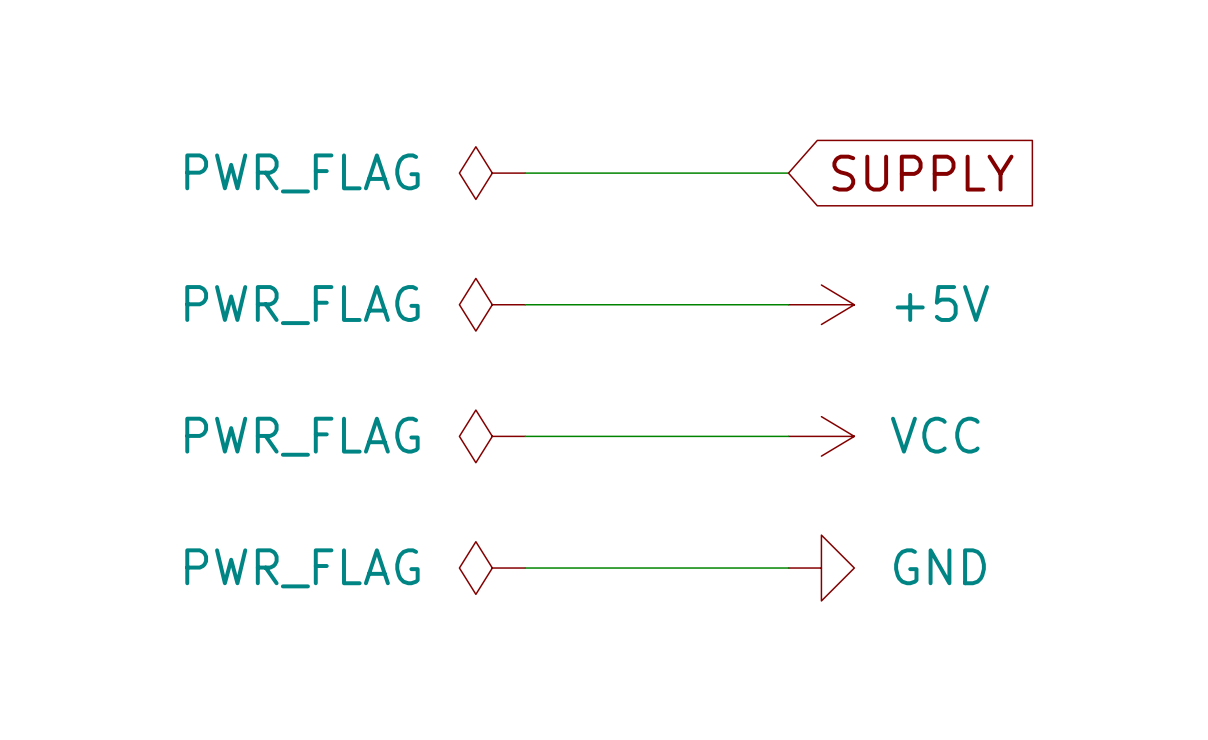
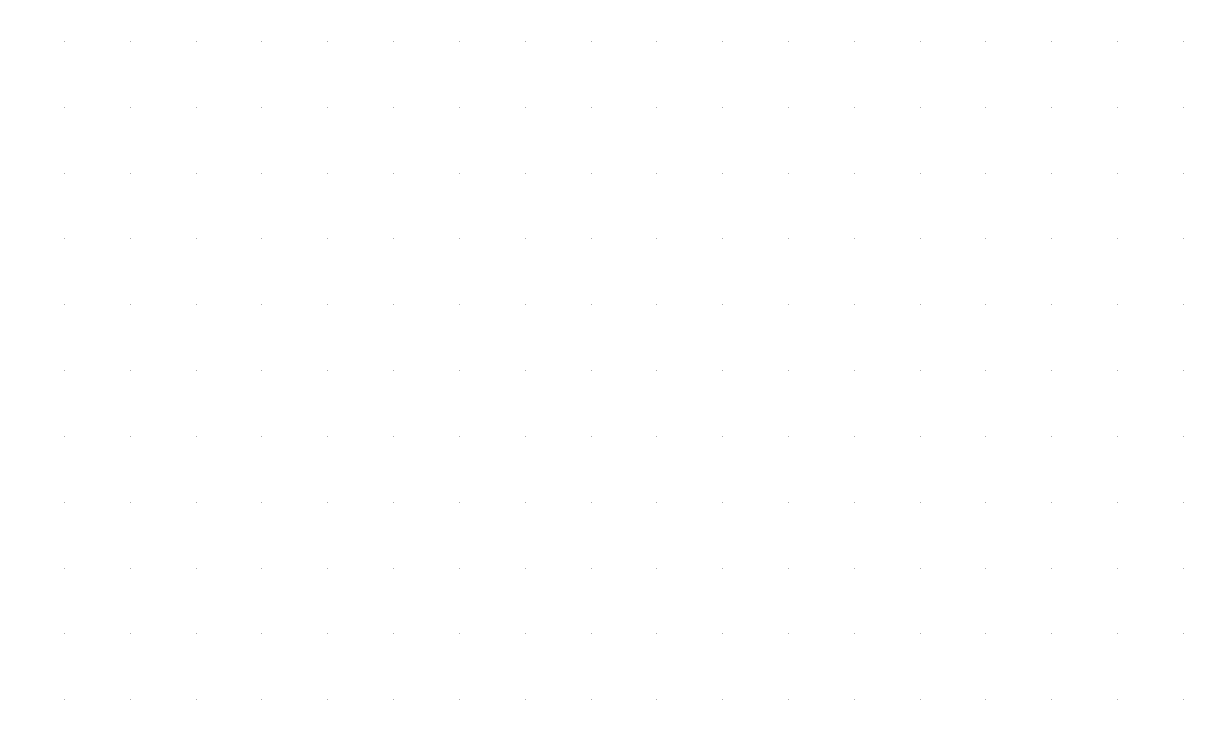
power symbol: PWR_FLAG (492, 173) -> none
wire: (525, 173) (788, 173) -> none
global label: SUPPLY (922, 173) -> none
power symbol: PWR_FLAG (492, 304) -> none
wire: (525, 304) (788, 304) -> none
power symbol: +5V (821, 304) -> none
power symbol: PWR_FLAG (492, 436) -> none
wire: (525, 436) (788, 436) -> none
power symbol: VCC (821, 436) -> none
power symbol: PWR_FLAG (492, 568) -> none
wire: (525, 568) (788, 568) -> none
power symbol: GND (821, 568) -> none

